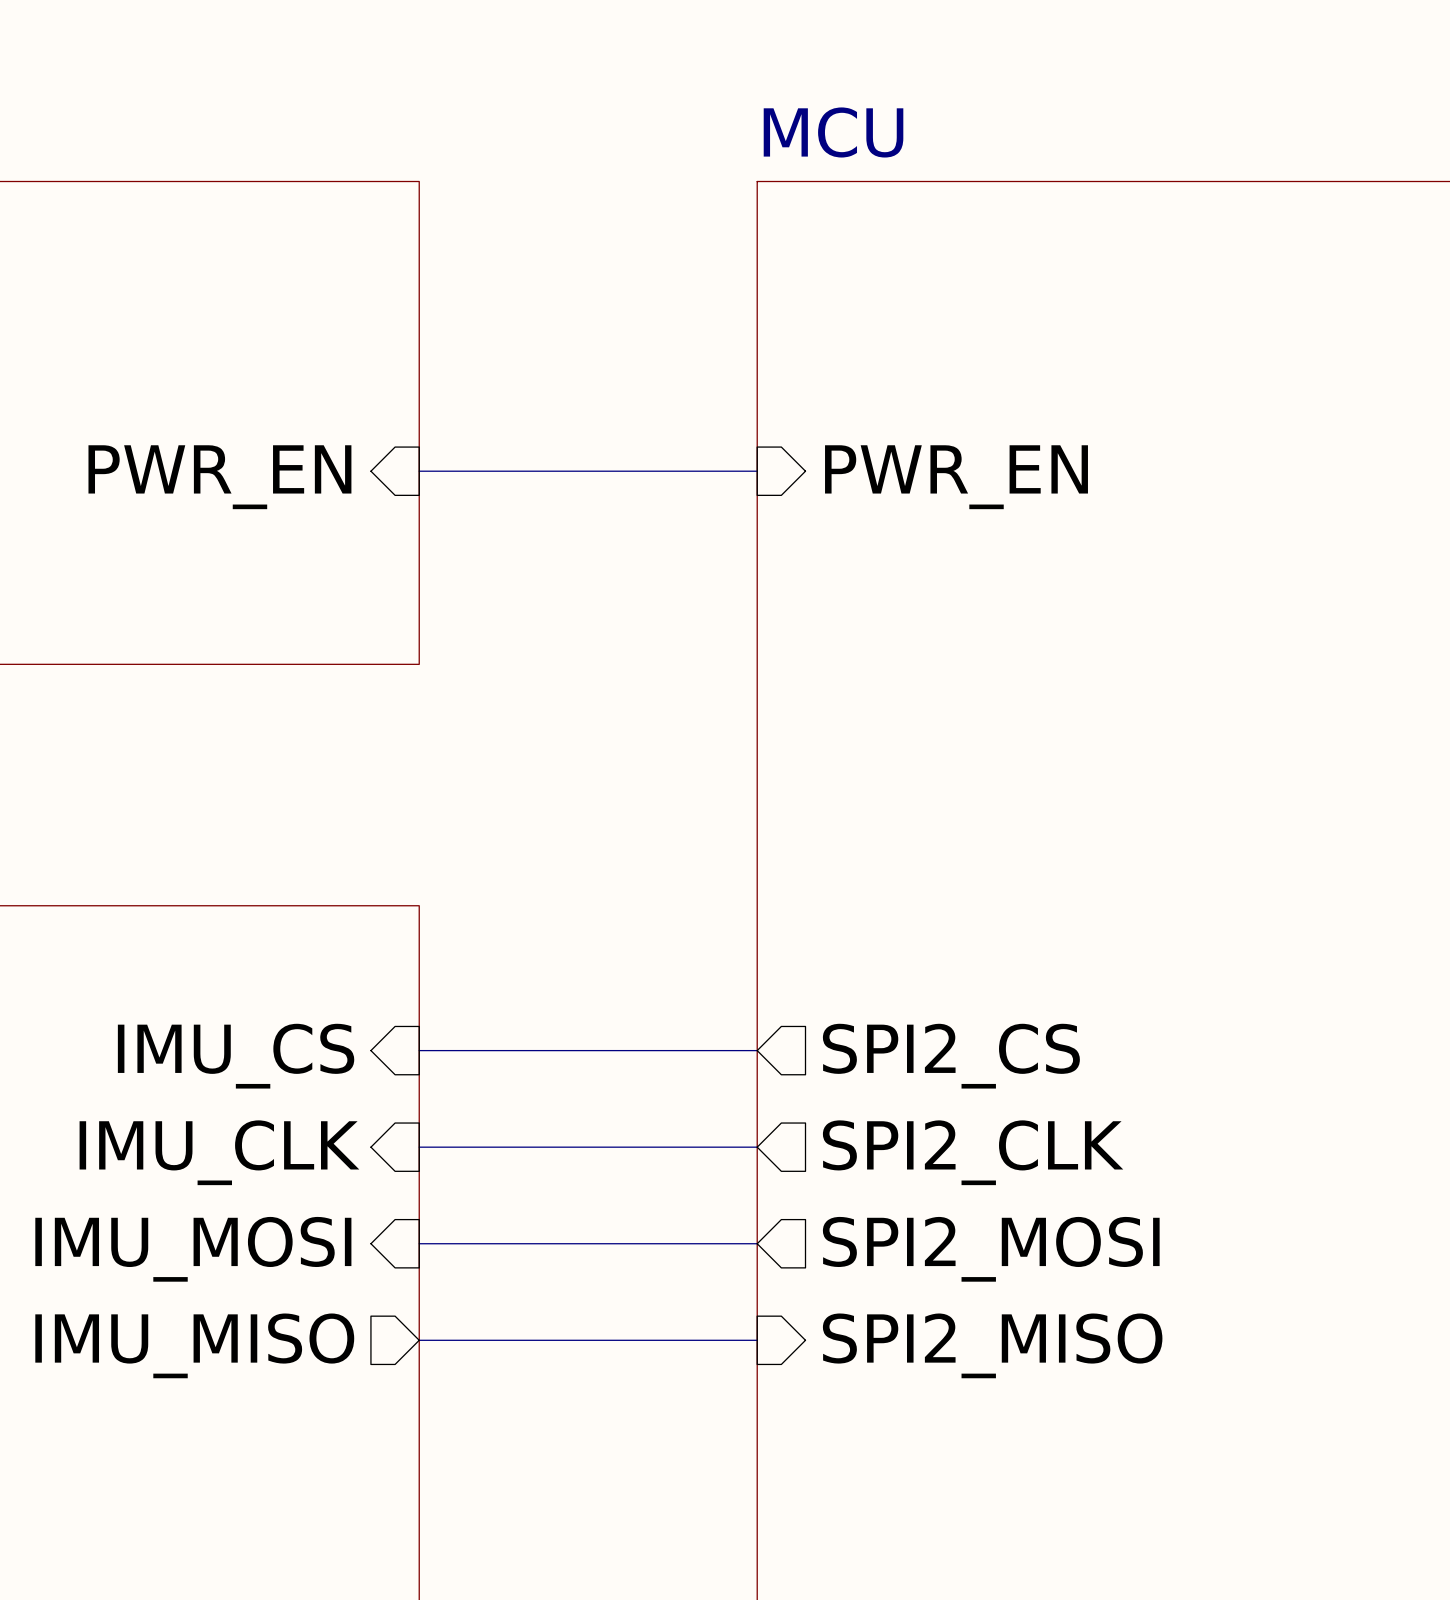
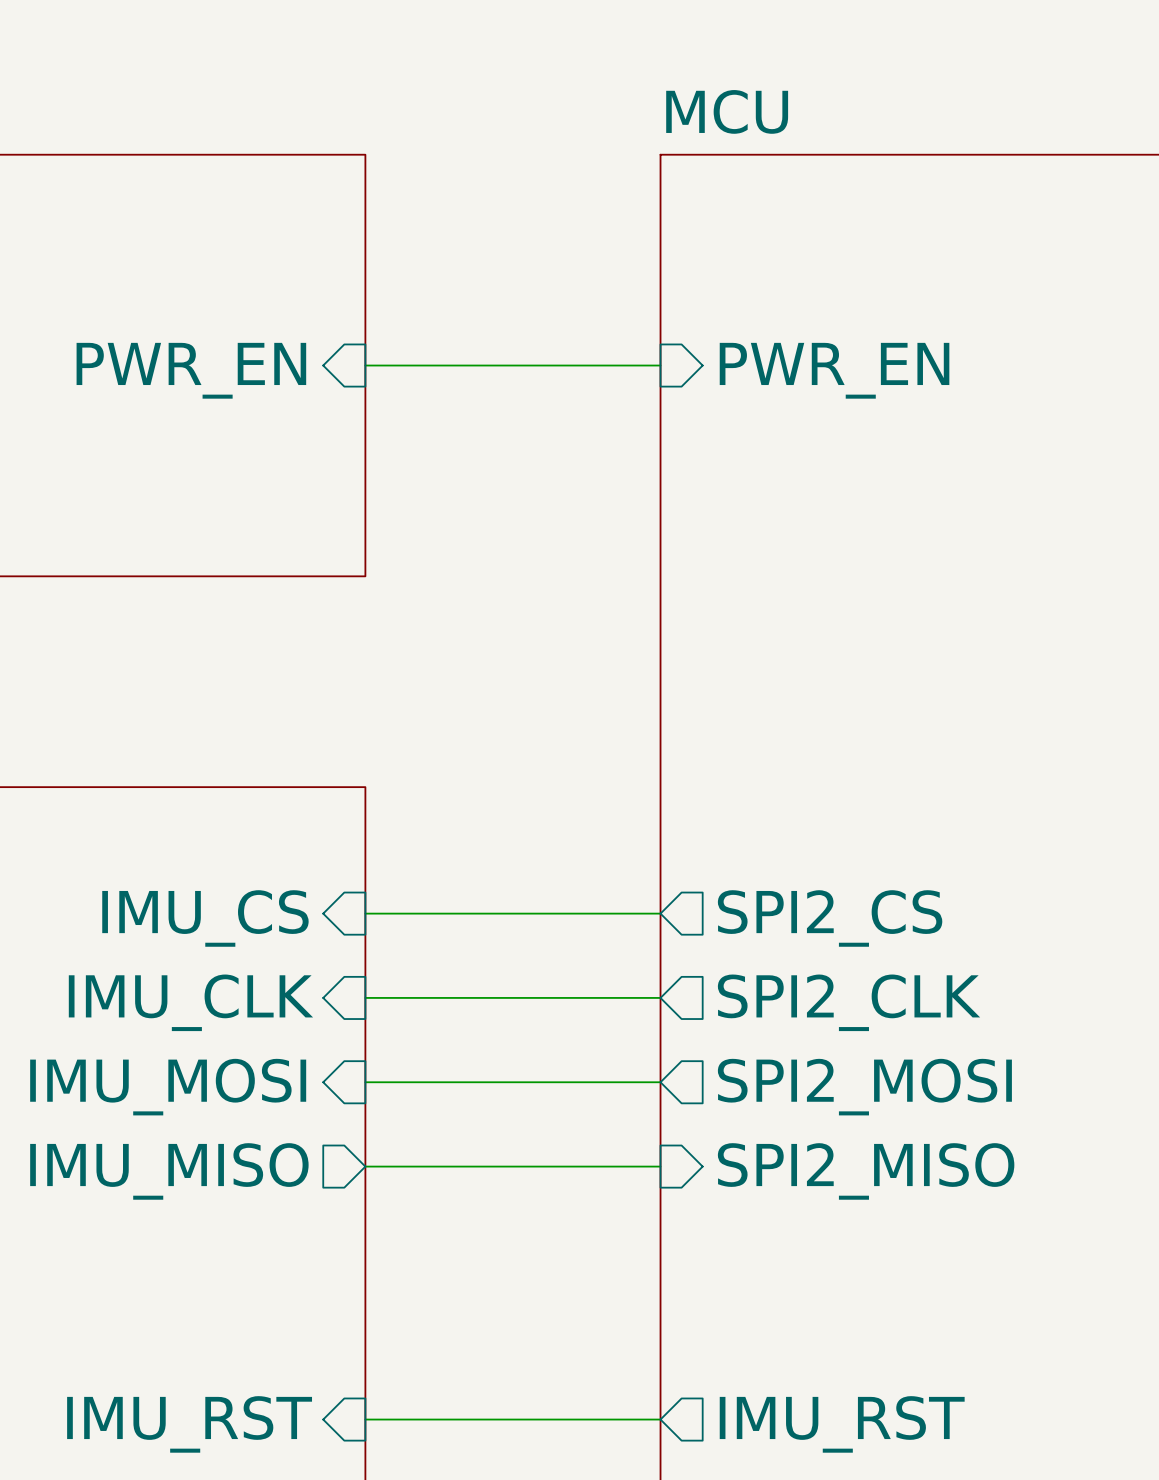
wire: (419, 471) (757, 471) -> (365, 365) (660, 365)
sheet pin position: PWR_EN (219, 477) -> PWR_EN (191, 370)
sheet pin position: PWR_EN (956, 477) -> PWR_EN (834, 370)

